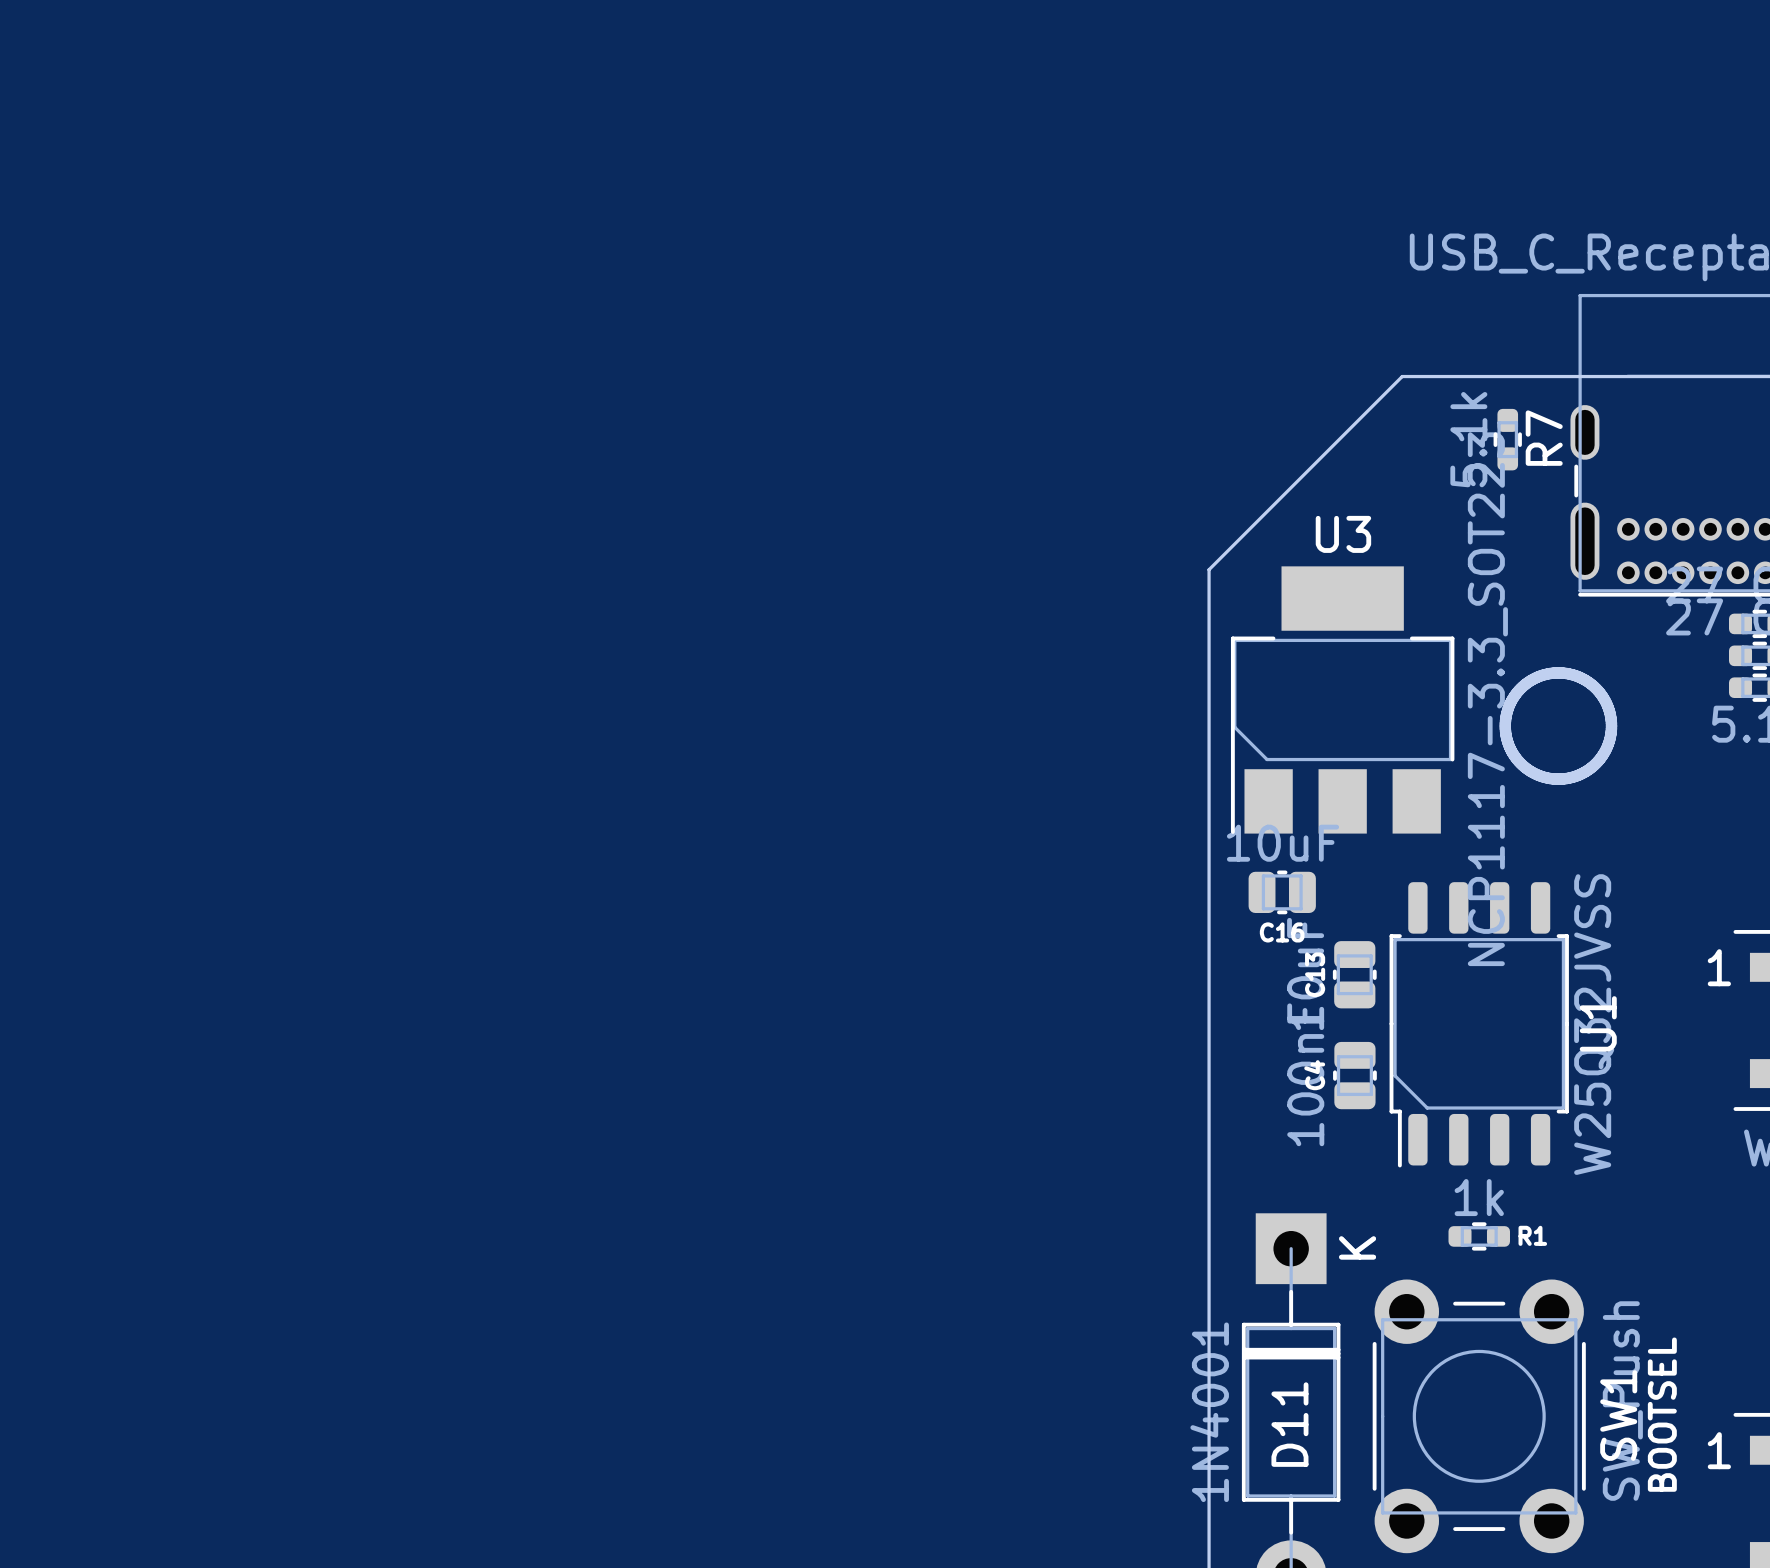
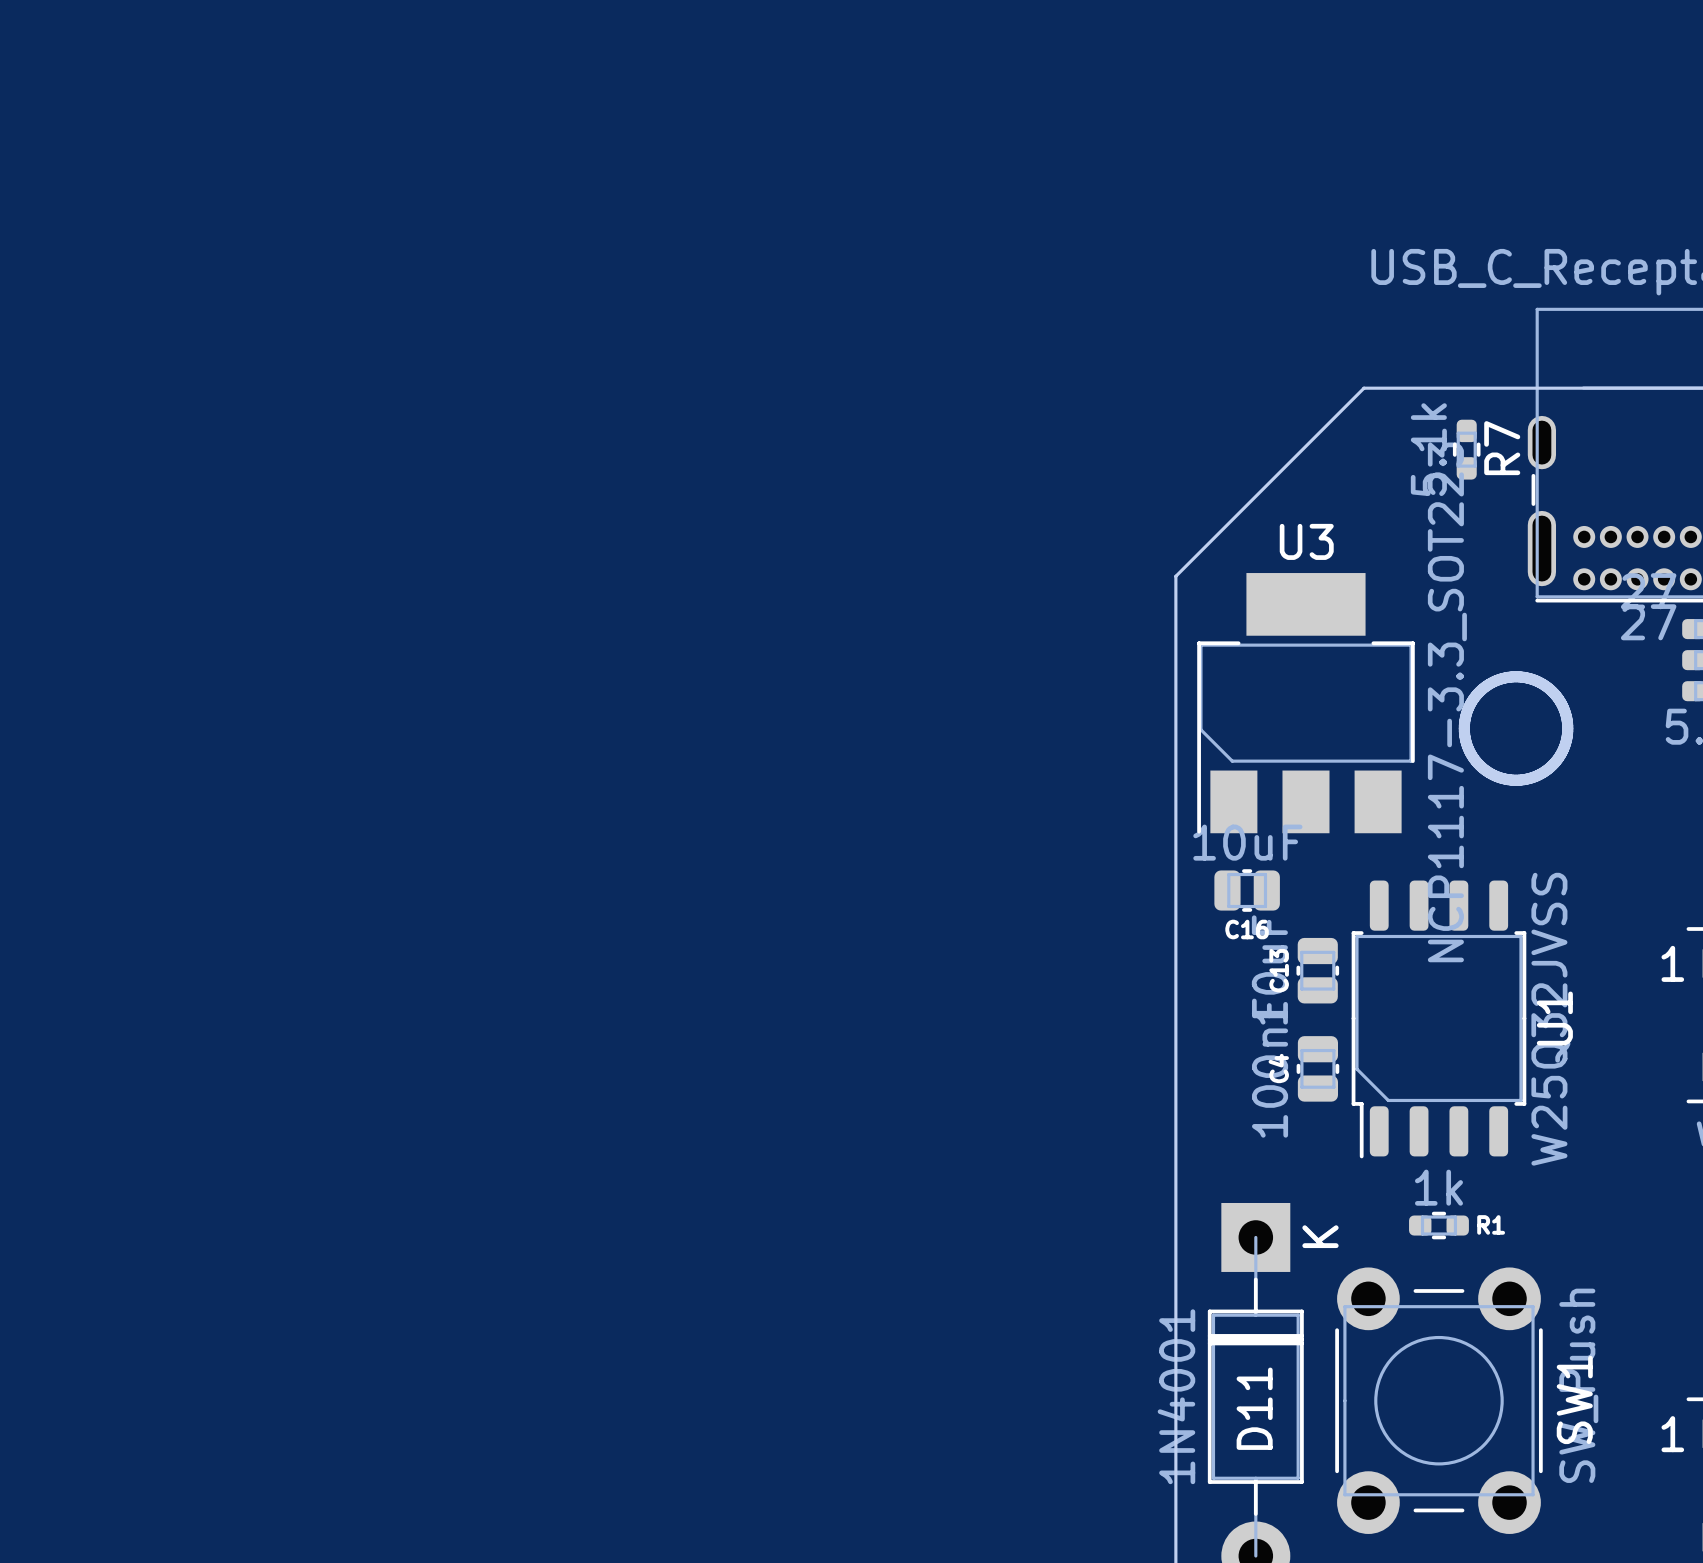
text: BOOTSEL (1662, 1414) -> none

